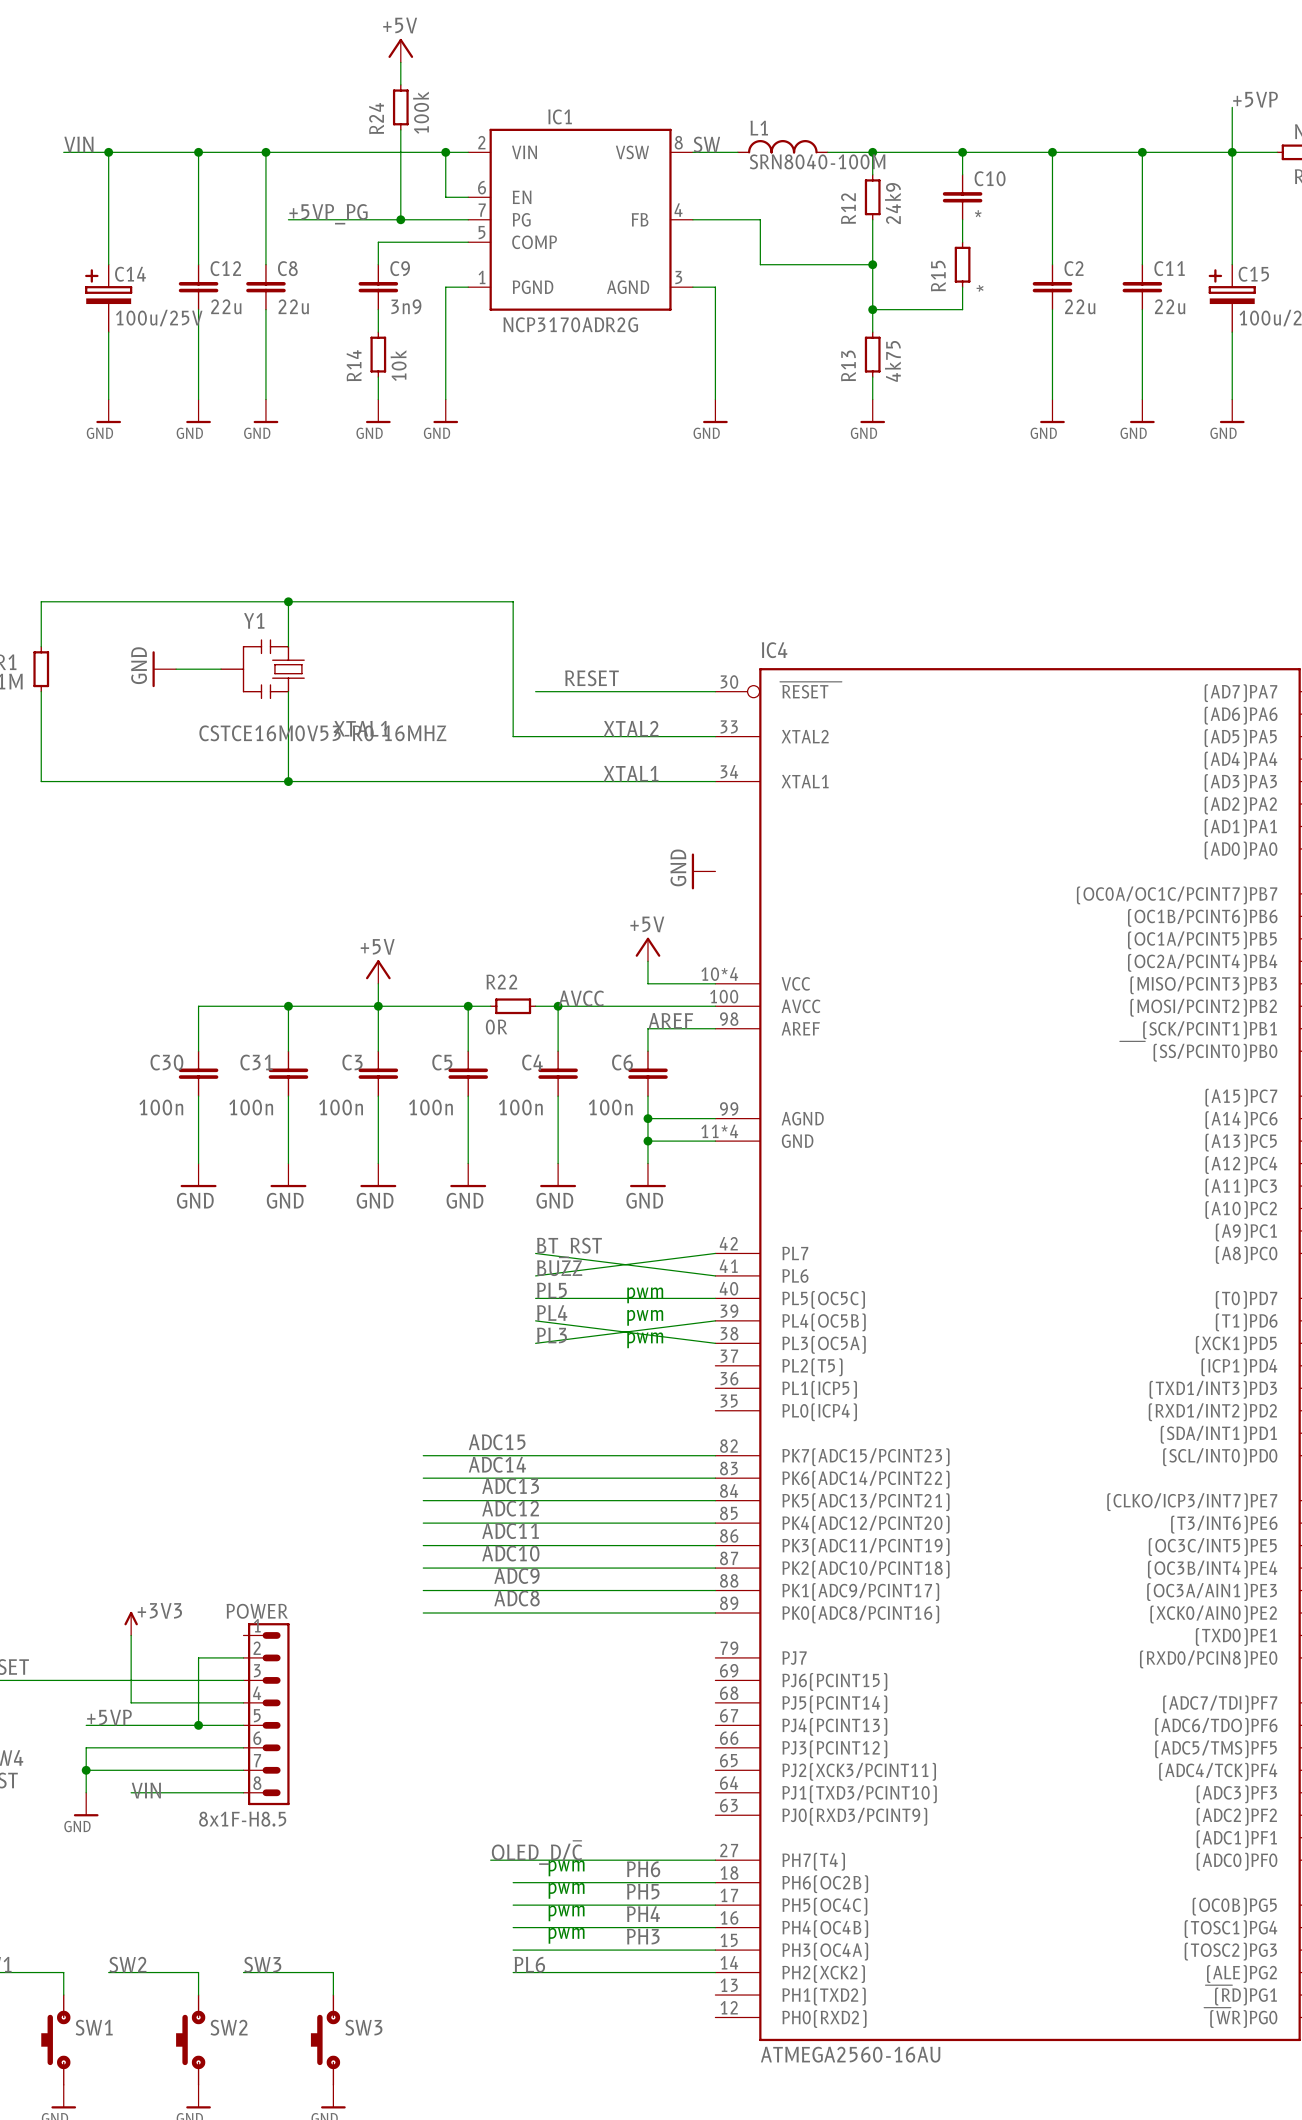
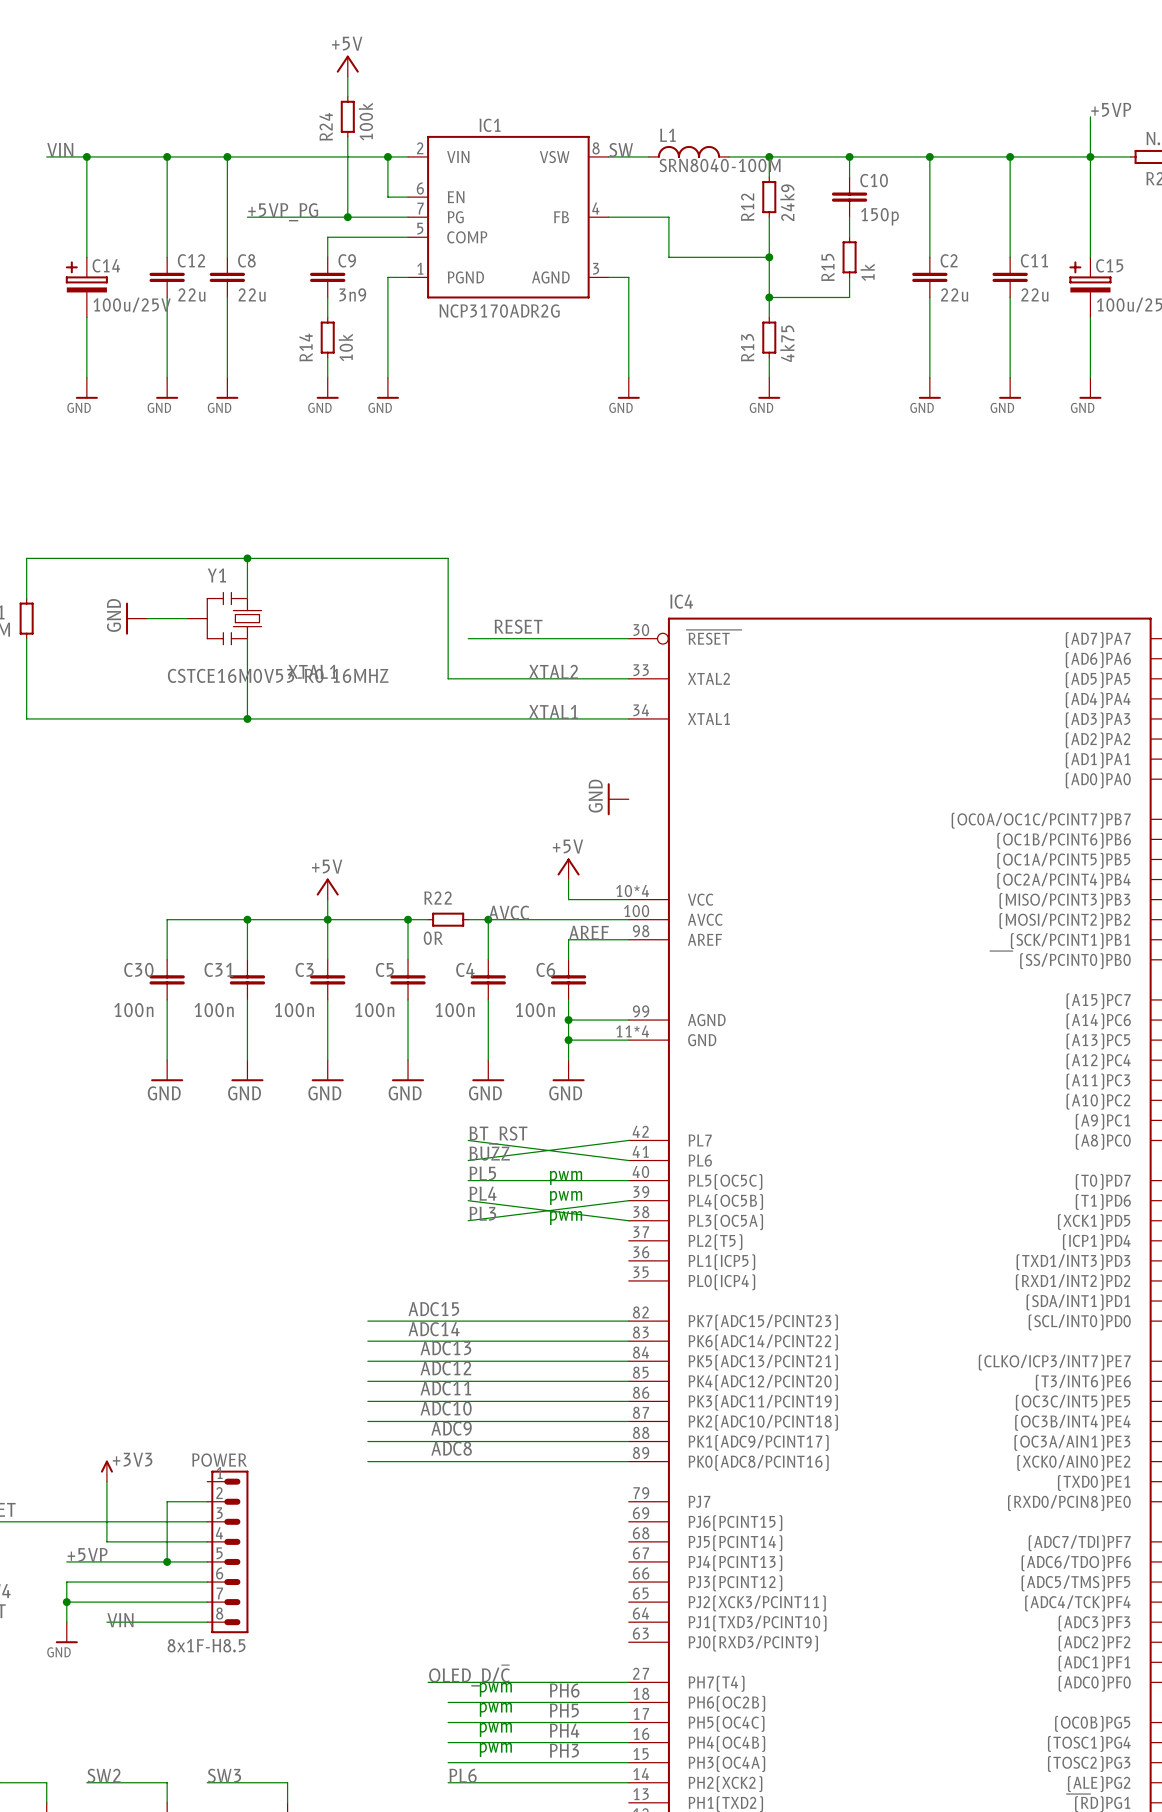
C10 value: * (978, 213) -> 150p (879, 216)
R15 value: * (980, 288) -> 1k (867, 272)

